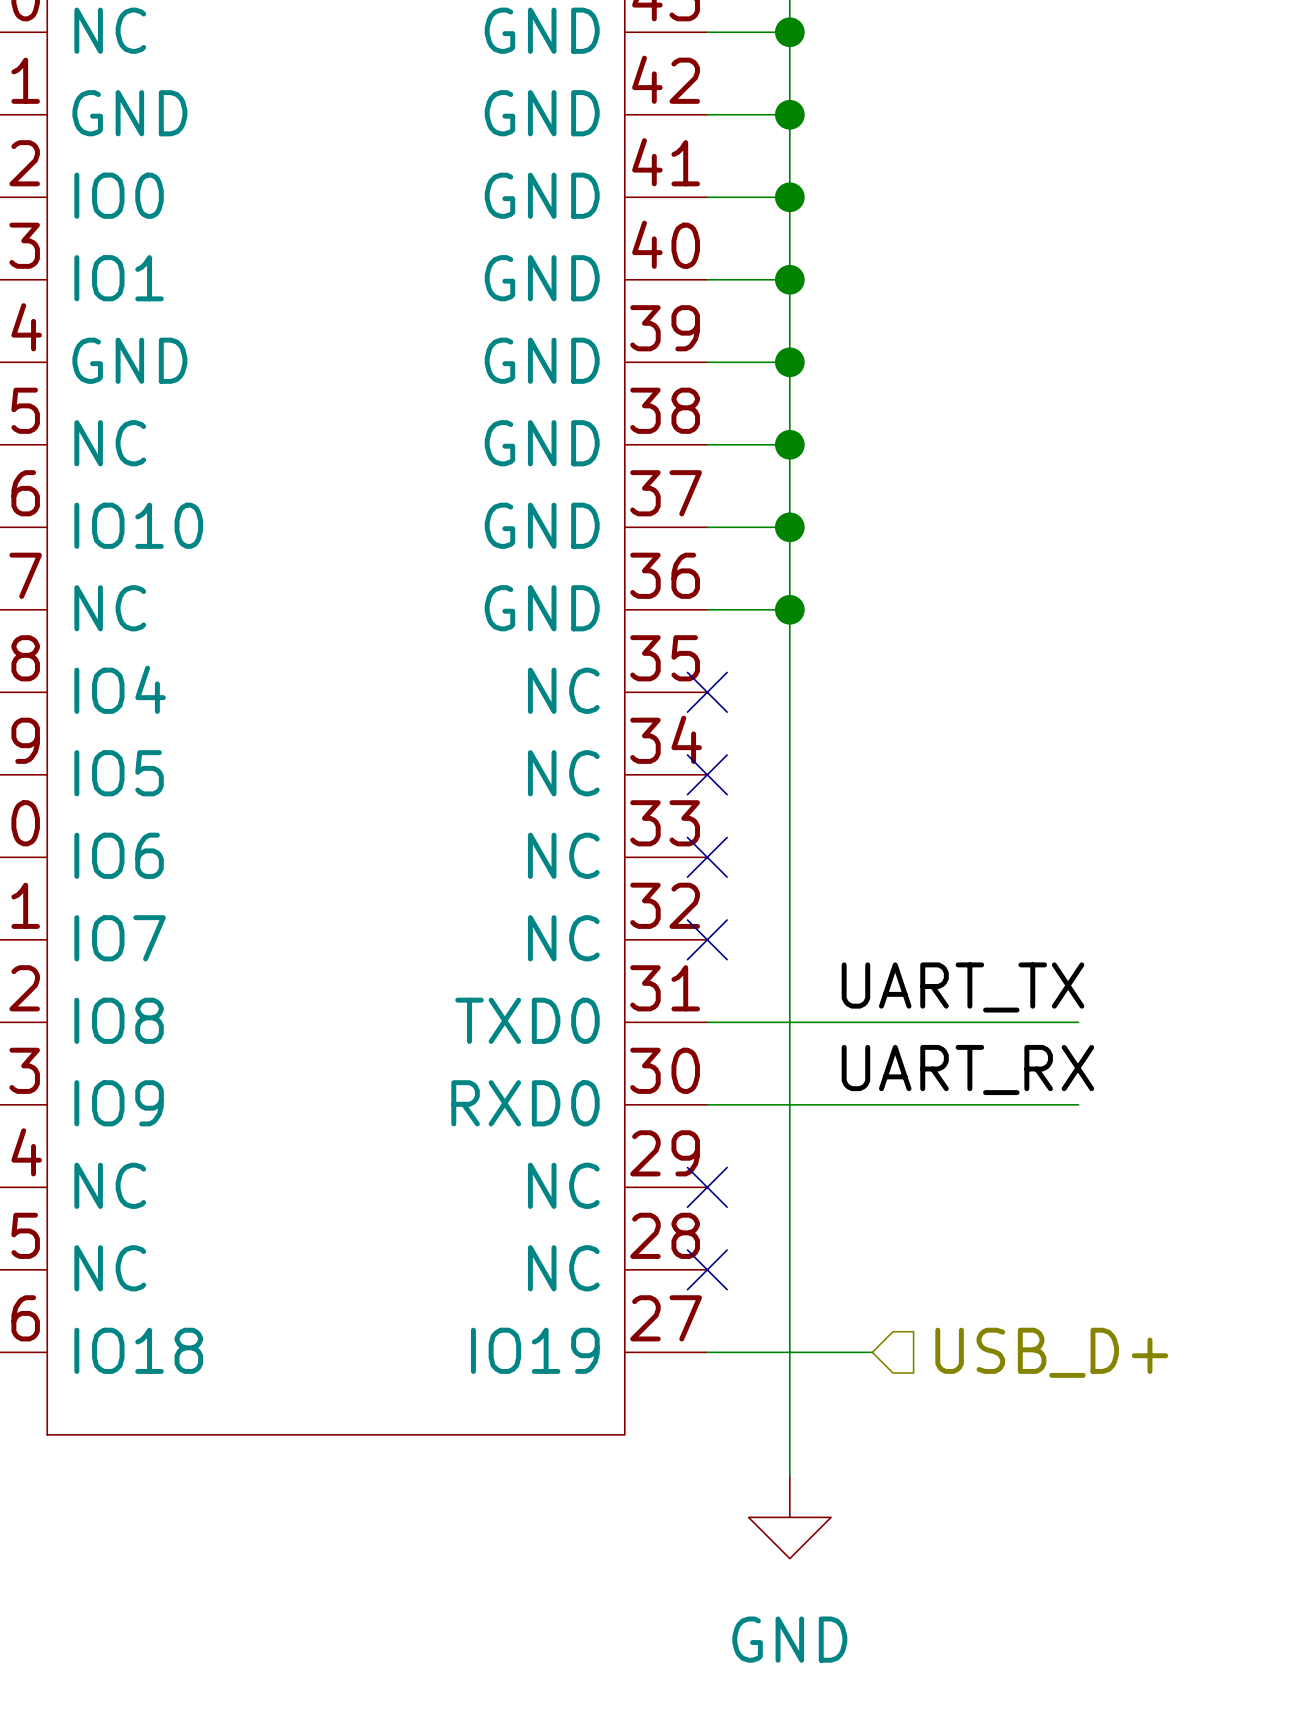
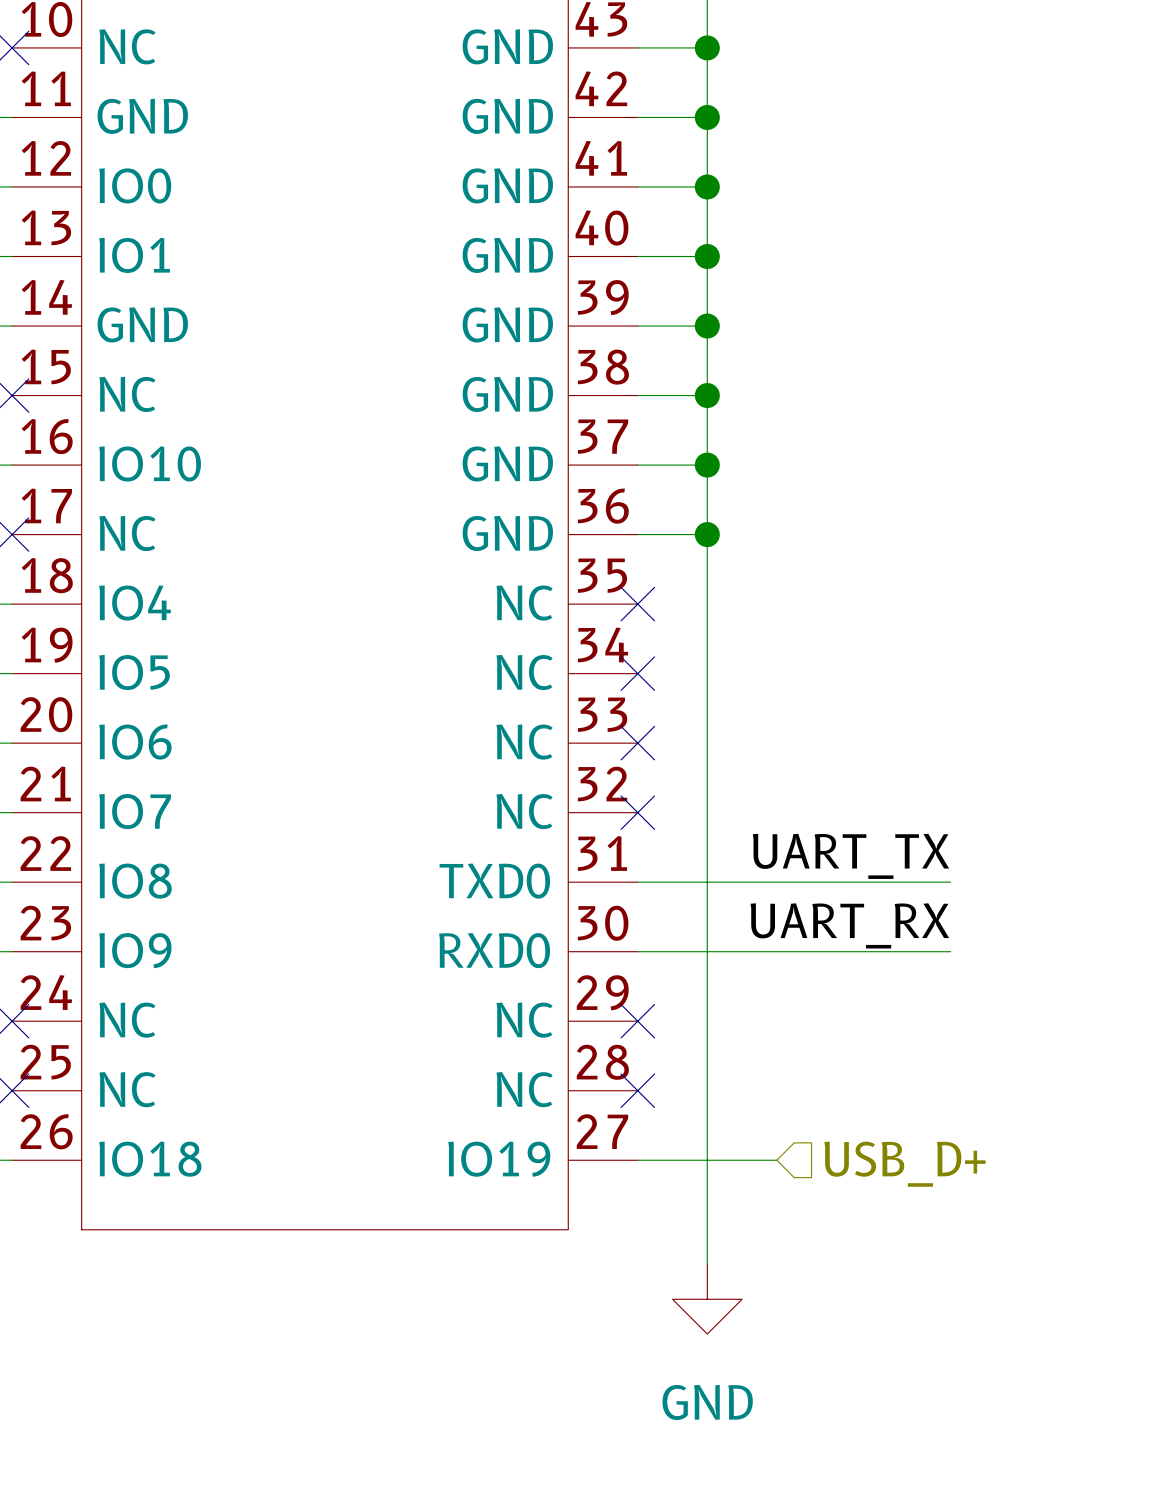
label position: UART_TX (963, 987) -> UART_TX (850, 856)
label position: UART_RX (967, 1069) -> UART_RX (849, 925)

